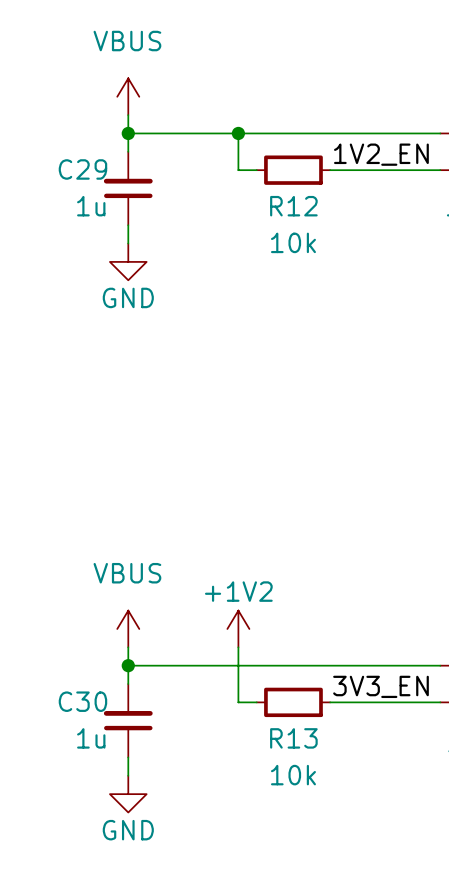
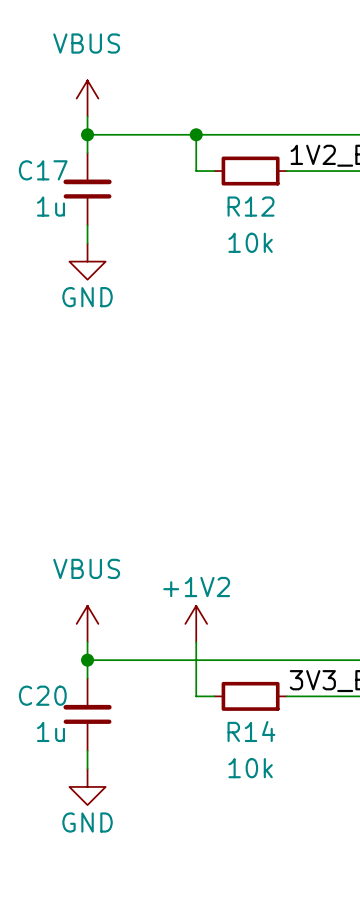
C29 name: C29 (82, 169) -> C17 (43, 170)
C30 name: C30 (82, 701) -> C20 (42, 695)
R13 name: R13 (293, 738) -> R14 (251, 731)

